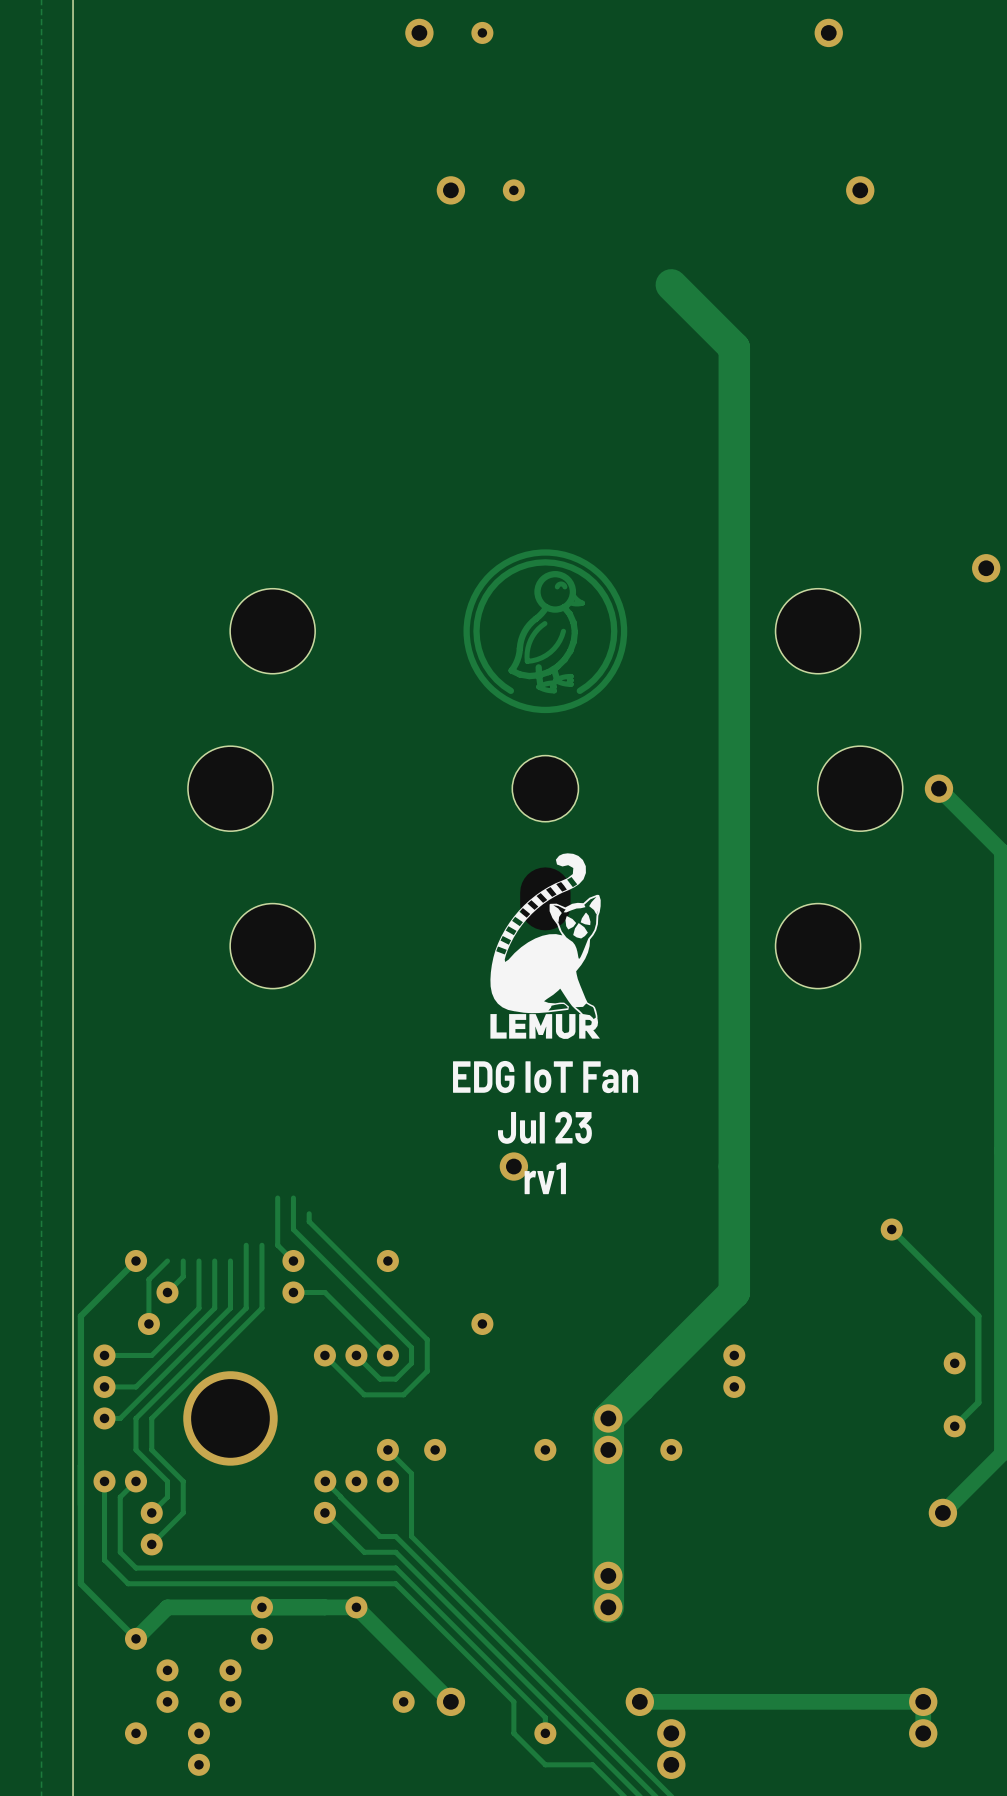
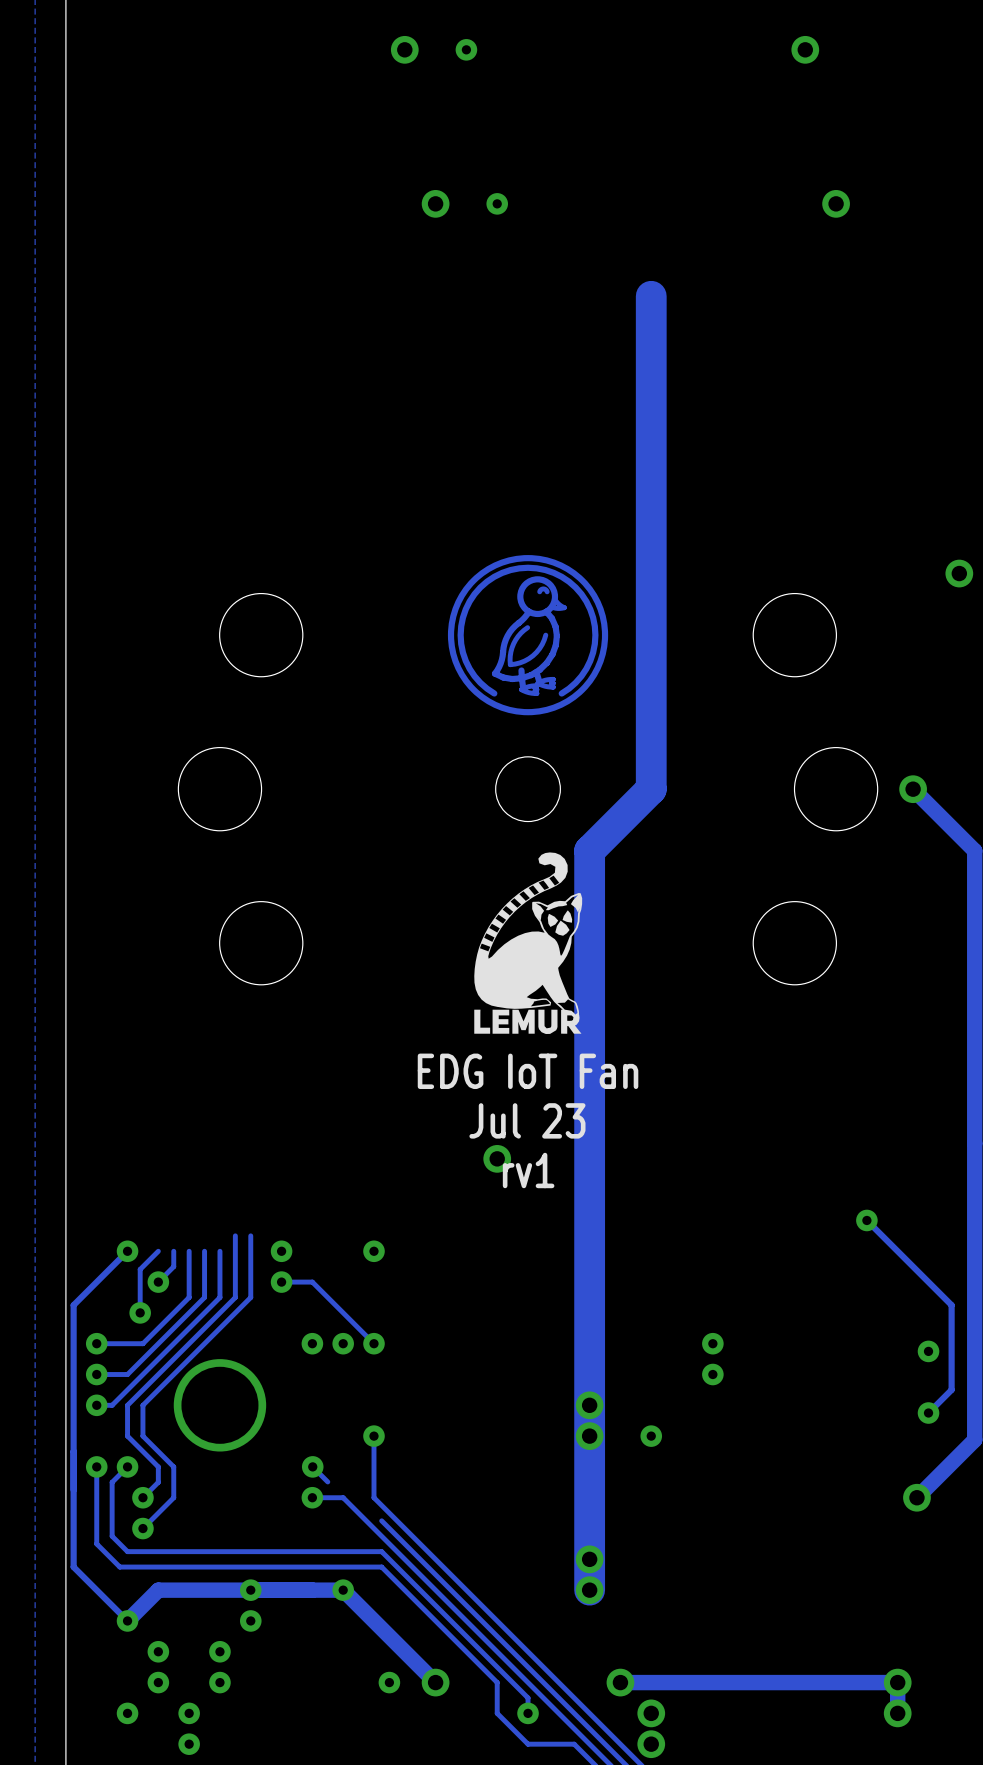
track: (671, 284) (734, 347) (734, 1292) (608, 1418) -> (651, 296) (651, 789) (589, 850) (589, 1405)
track: (277, 1198) (277, 1245) (293, 1261) -> none
track: (293, 1198) (293, 1229) (411, 1347) (411, 1363) (395, 1379) (380, 1379) (356, 1355) -> none
track: (309, 1213) (309, 1221) (427, 1339) (427, 1371) (403, 1394) (364, 1394) (324, 1355) -> none
via: (482, 1323) -> none
track: (387, 1449) (411, 1473) (411, 1536) -> (373, 1436) (373, 1497) (397, 1520)
via: (435, 1449) -> none
via: (545, 1449) -> none
via: (356, 1481) -> none
via: (387, 1481) -> none
track: (340, 1497) (356, 1512) -> (312, 1497) (343, 1497)
track: (324, 1512) (364, 1552) (395, 1552) -> none
track: (395, 1536) (380, 1536) -> (381, 1536) (366, 1520)

